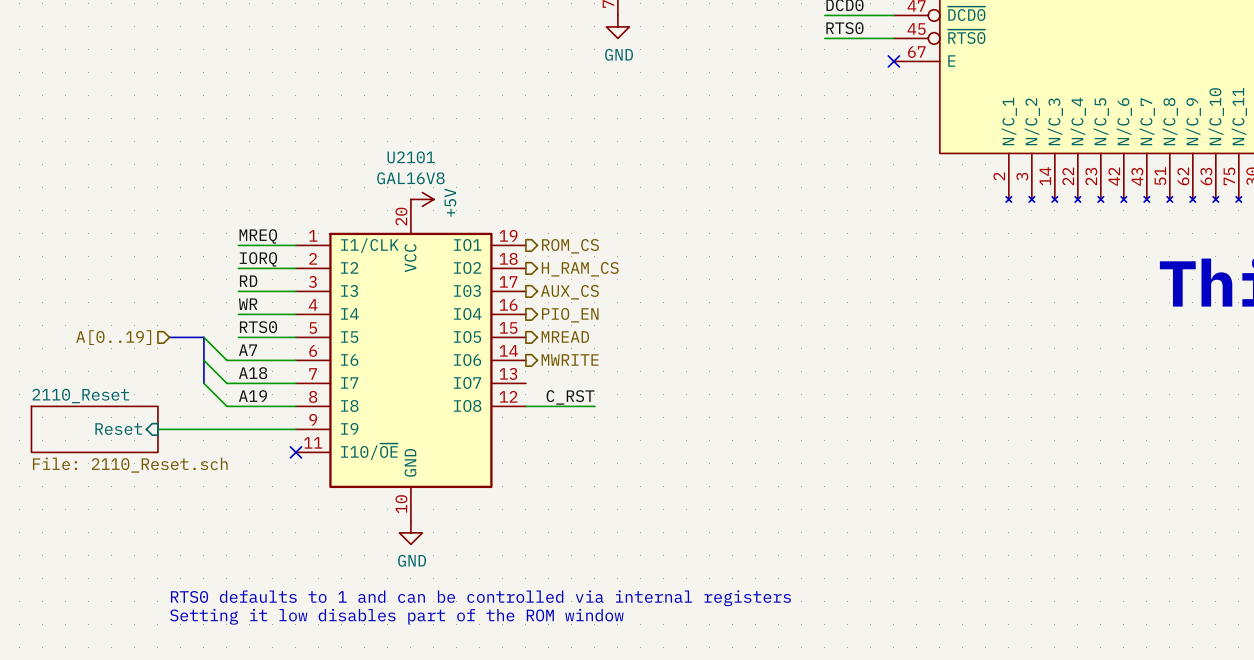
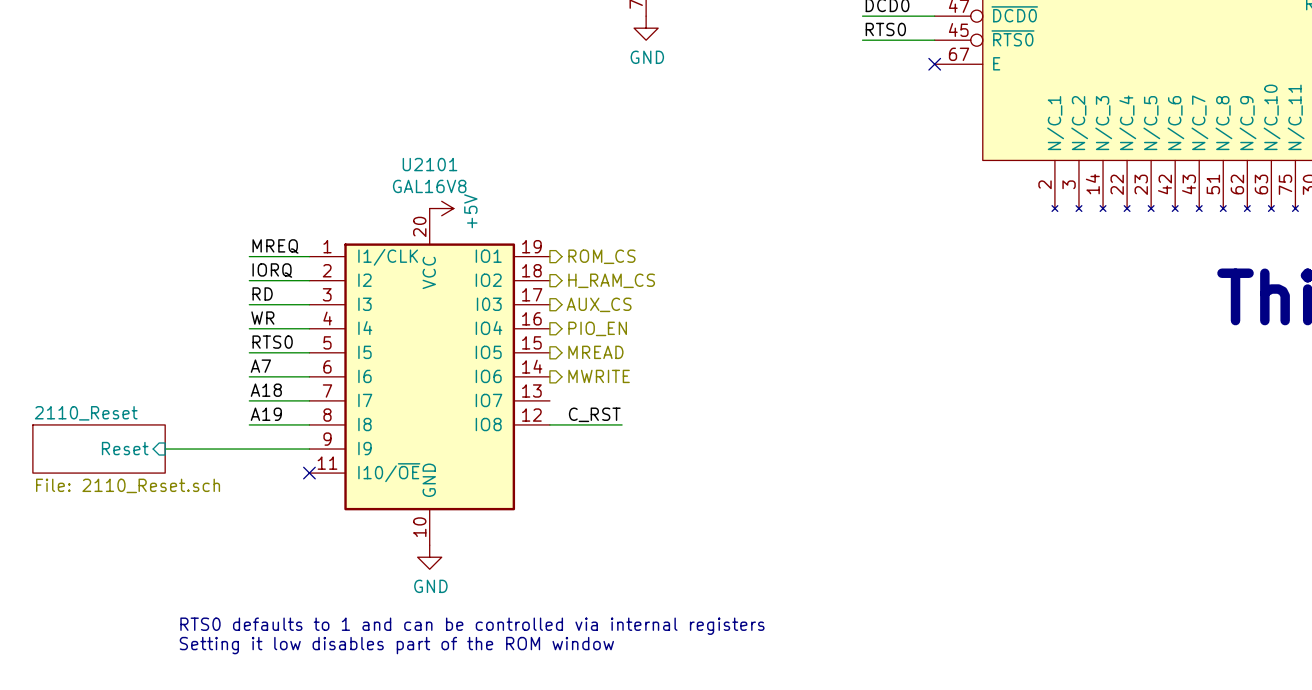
hierarchical label: A[0..19] (113, 337) -> none
bus: (169, 337) (203, 337) (203, 383) -> none
wire: (203, 337) (226, 360) (238, 360) -> none
wire: (203, 360) (226, 383) (238, 383) -> none
wire: (203, 383) (226, 406) (238, 406) -> none

